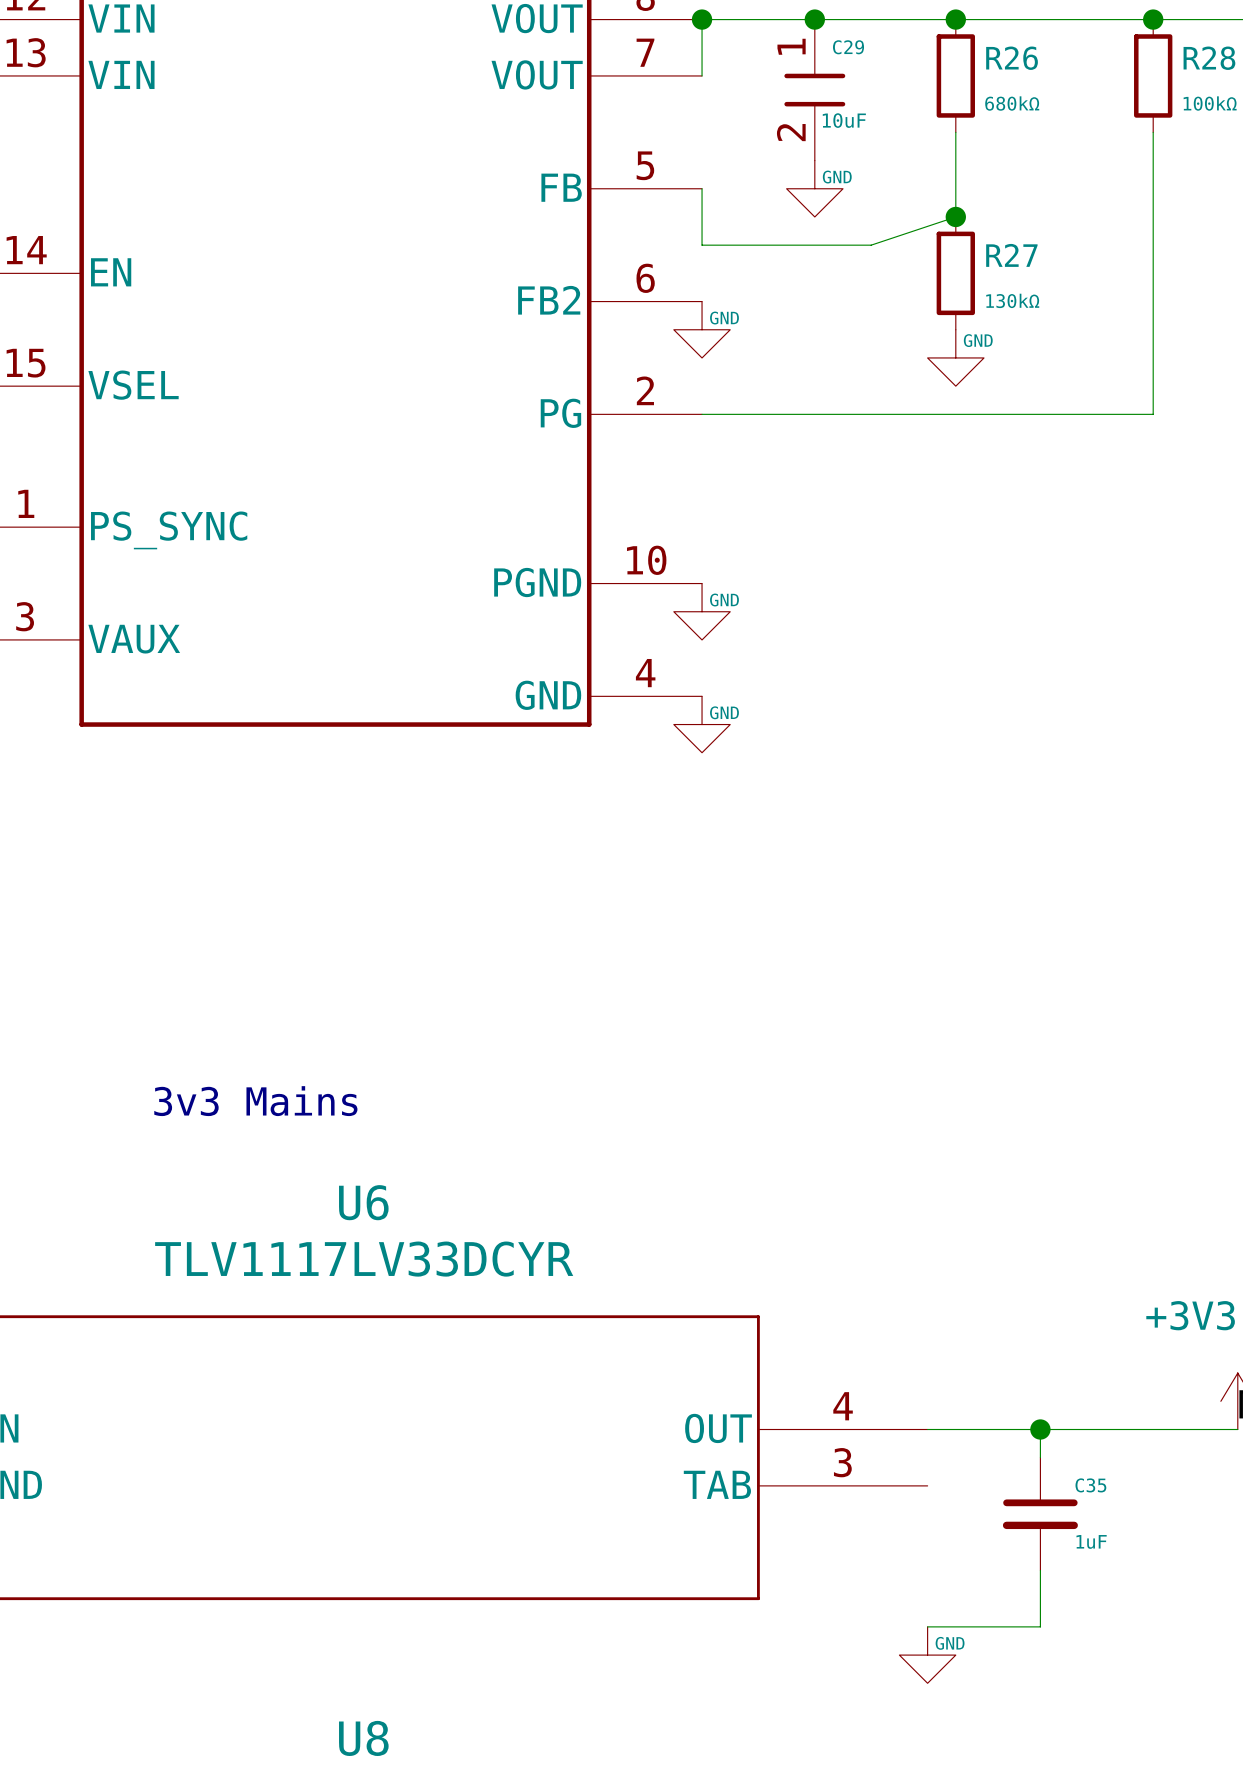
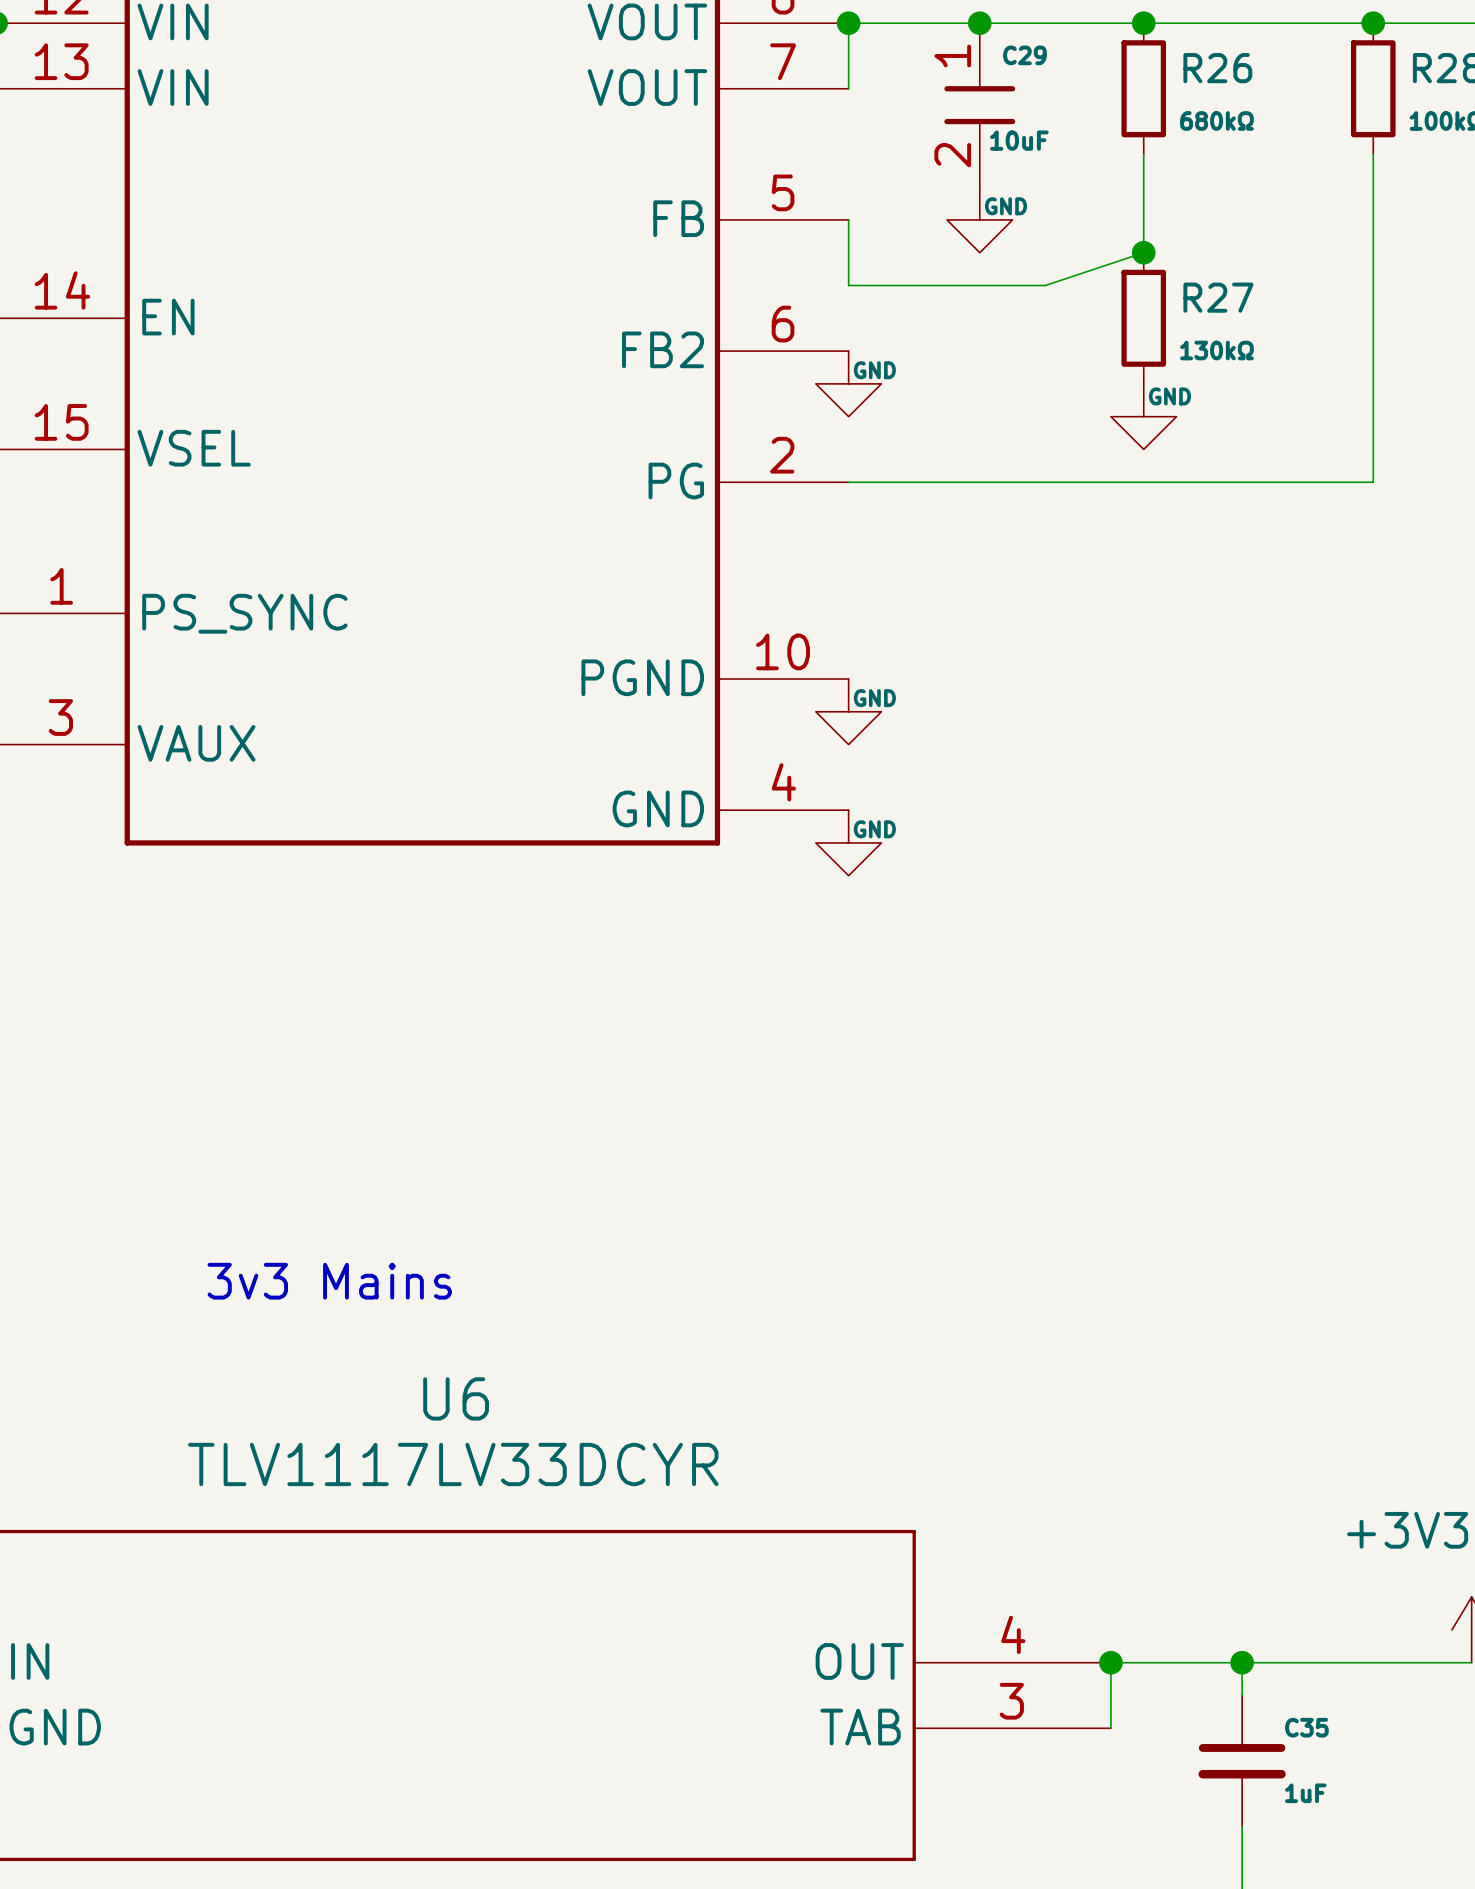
wire: none -> (1110, 1662) (1110, 1728)
junction: none -> (1110, 1662)

